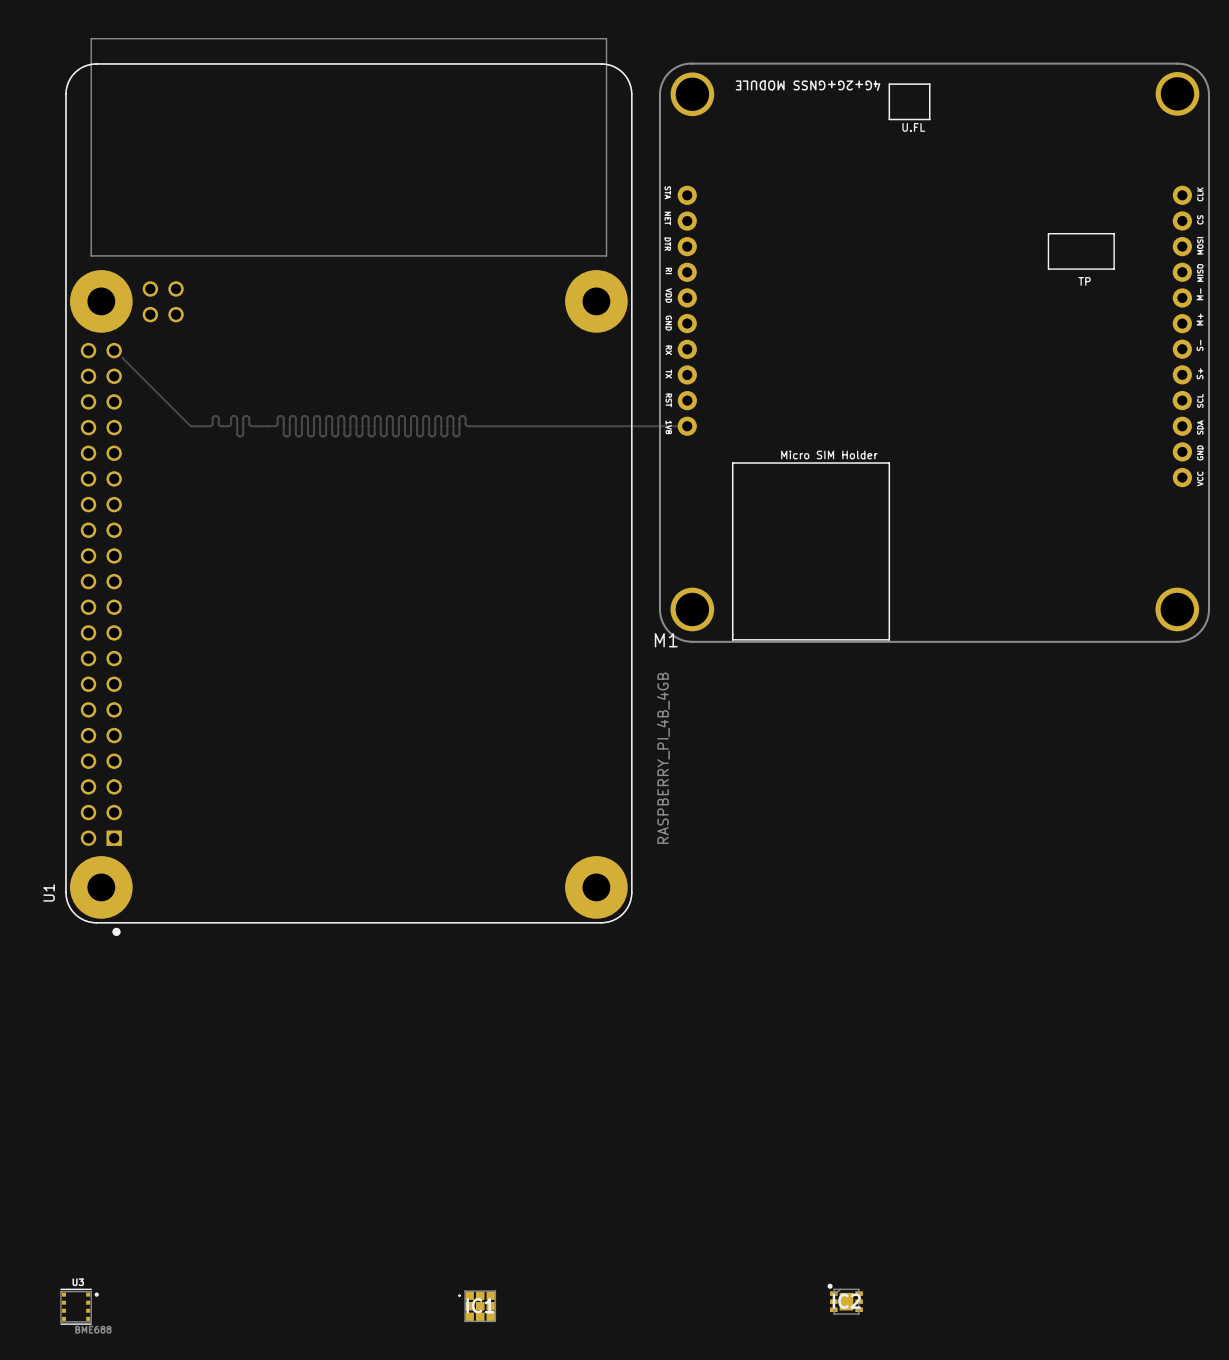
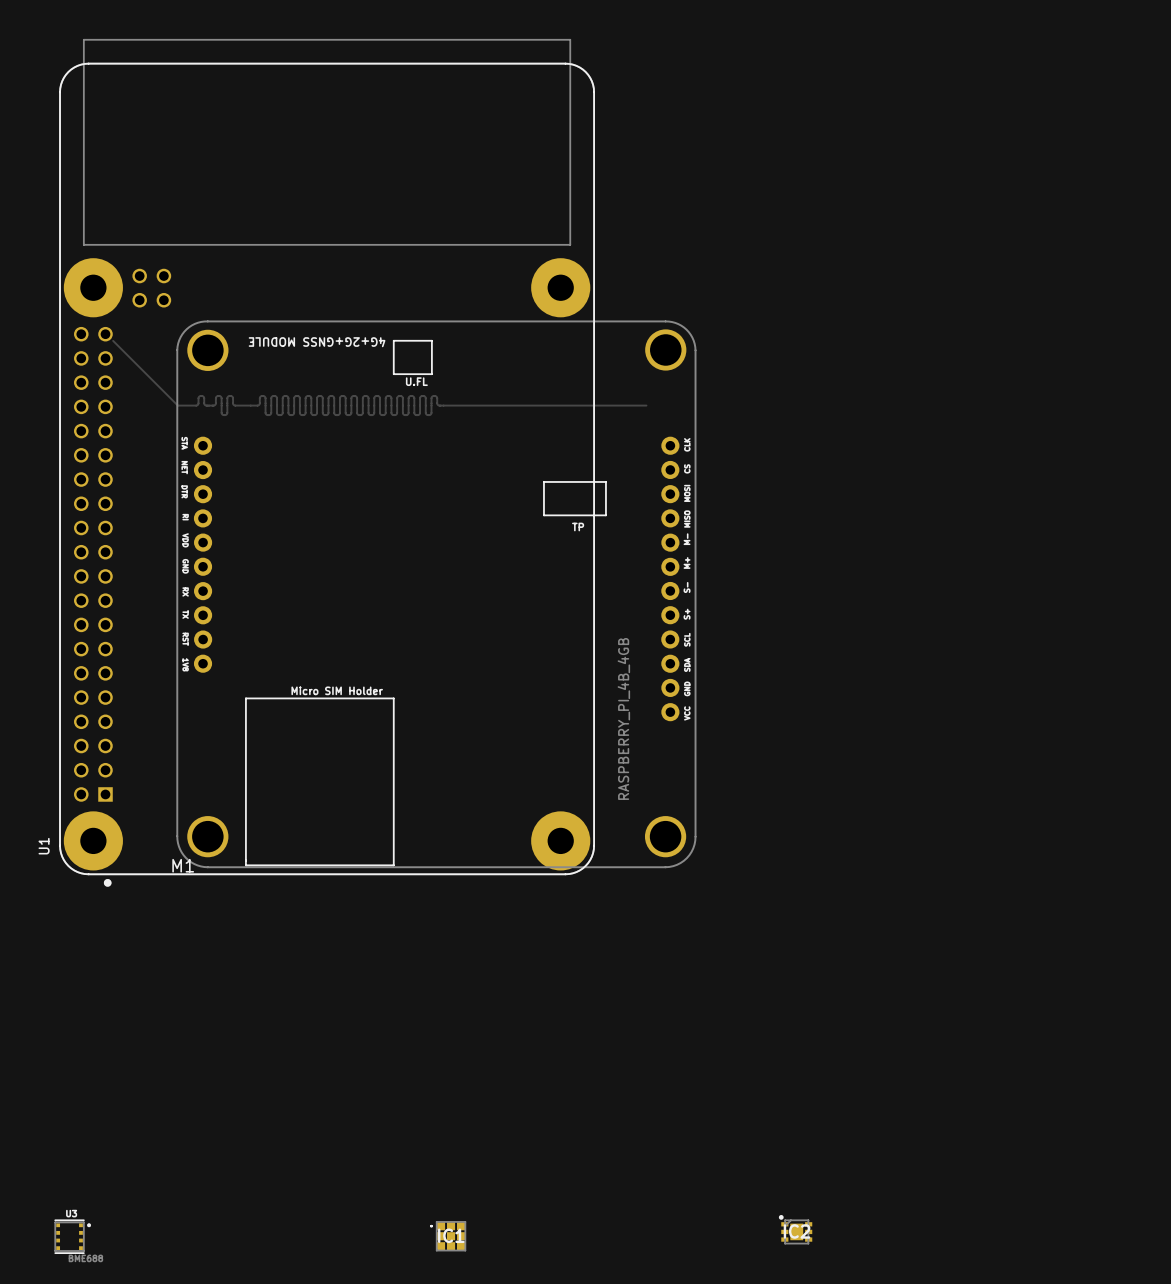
M1 position: (934, 352) -> (436, 594)

